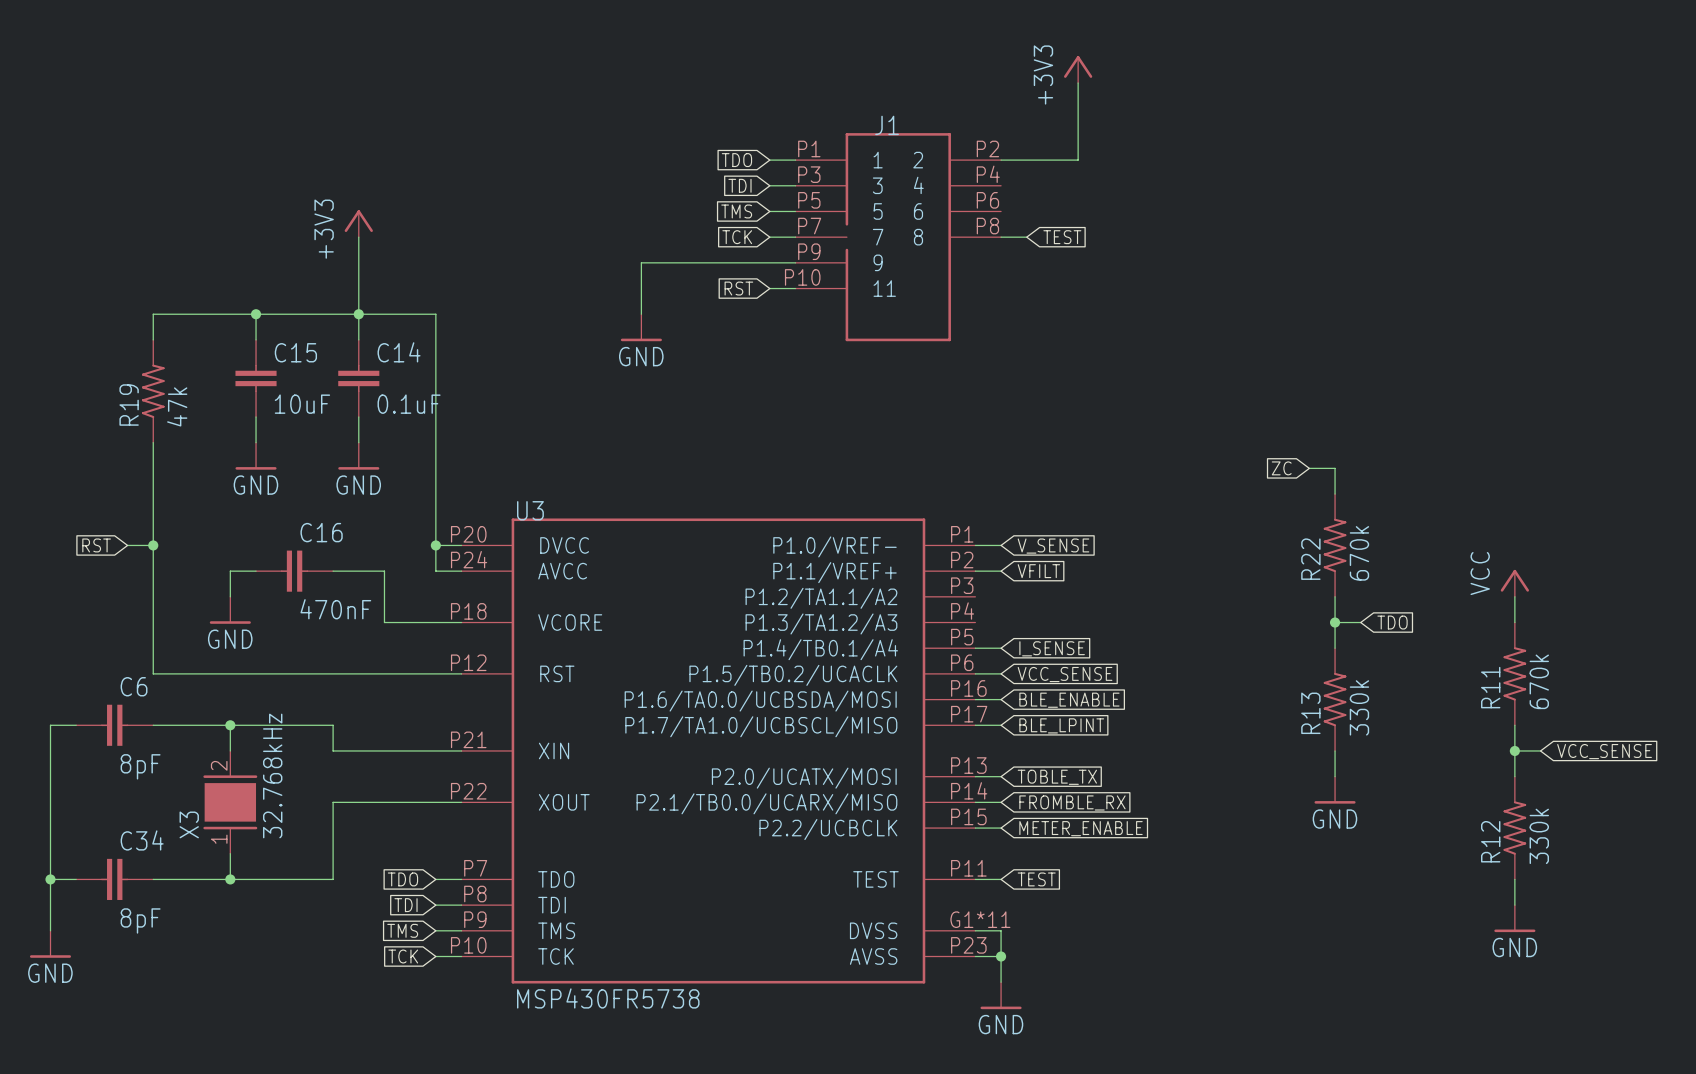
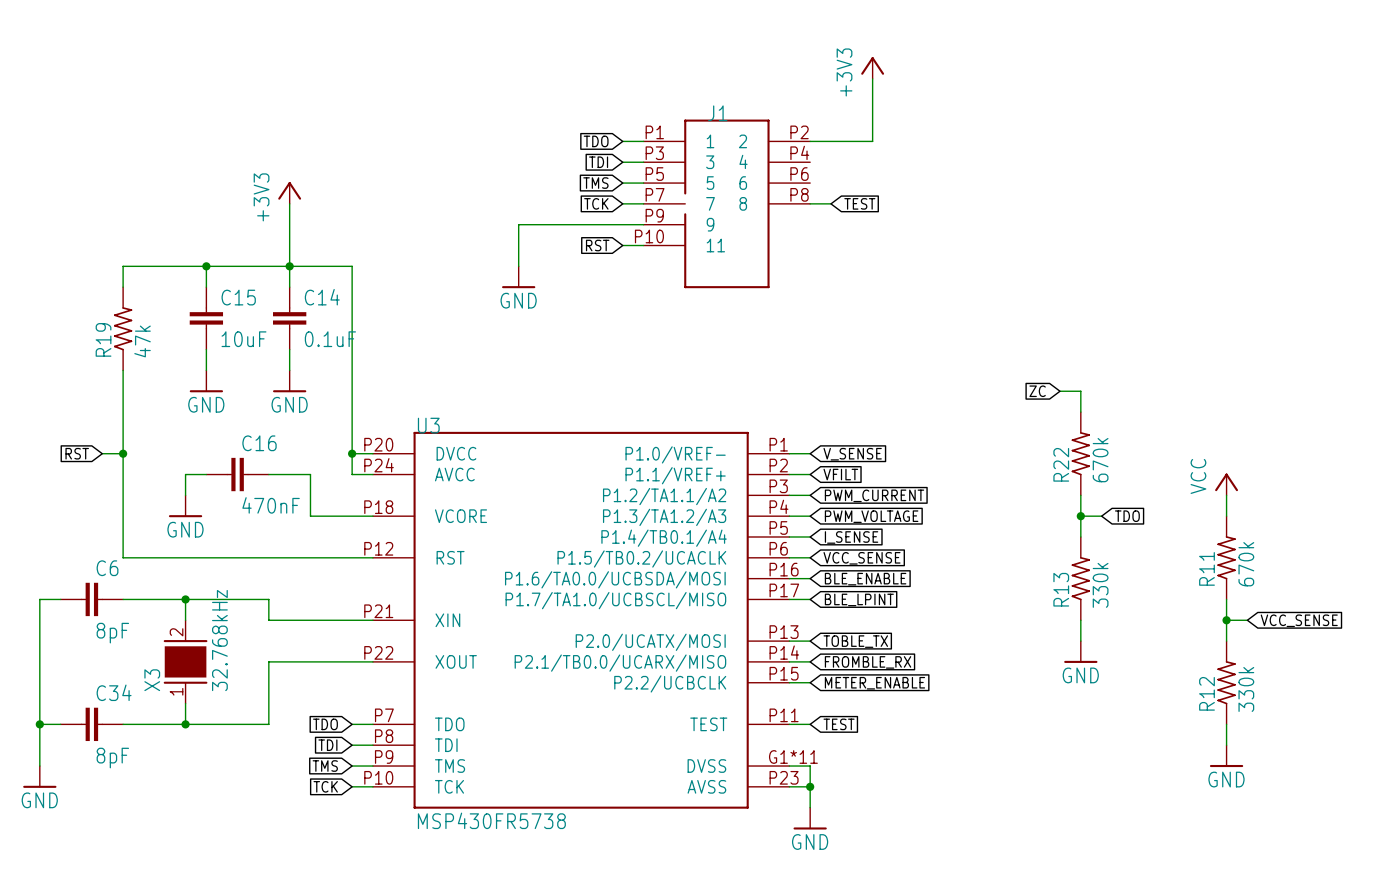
wire: none -> (789, 495) (810, 495)
global label: none -> PWM_CURRENT (874, 495)
wire: none -> (789, 516) (810, 516)
global label: none -> PWM_VOLTAGE (871, 516)

